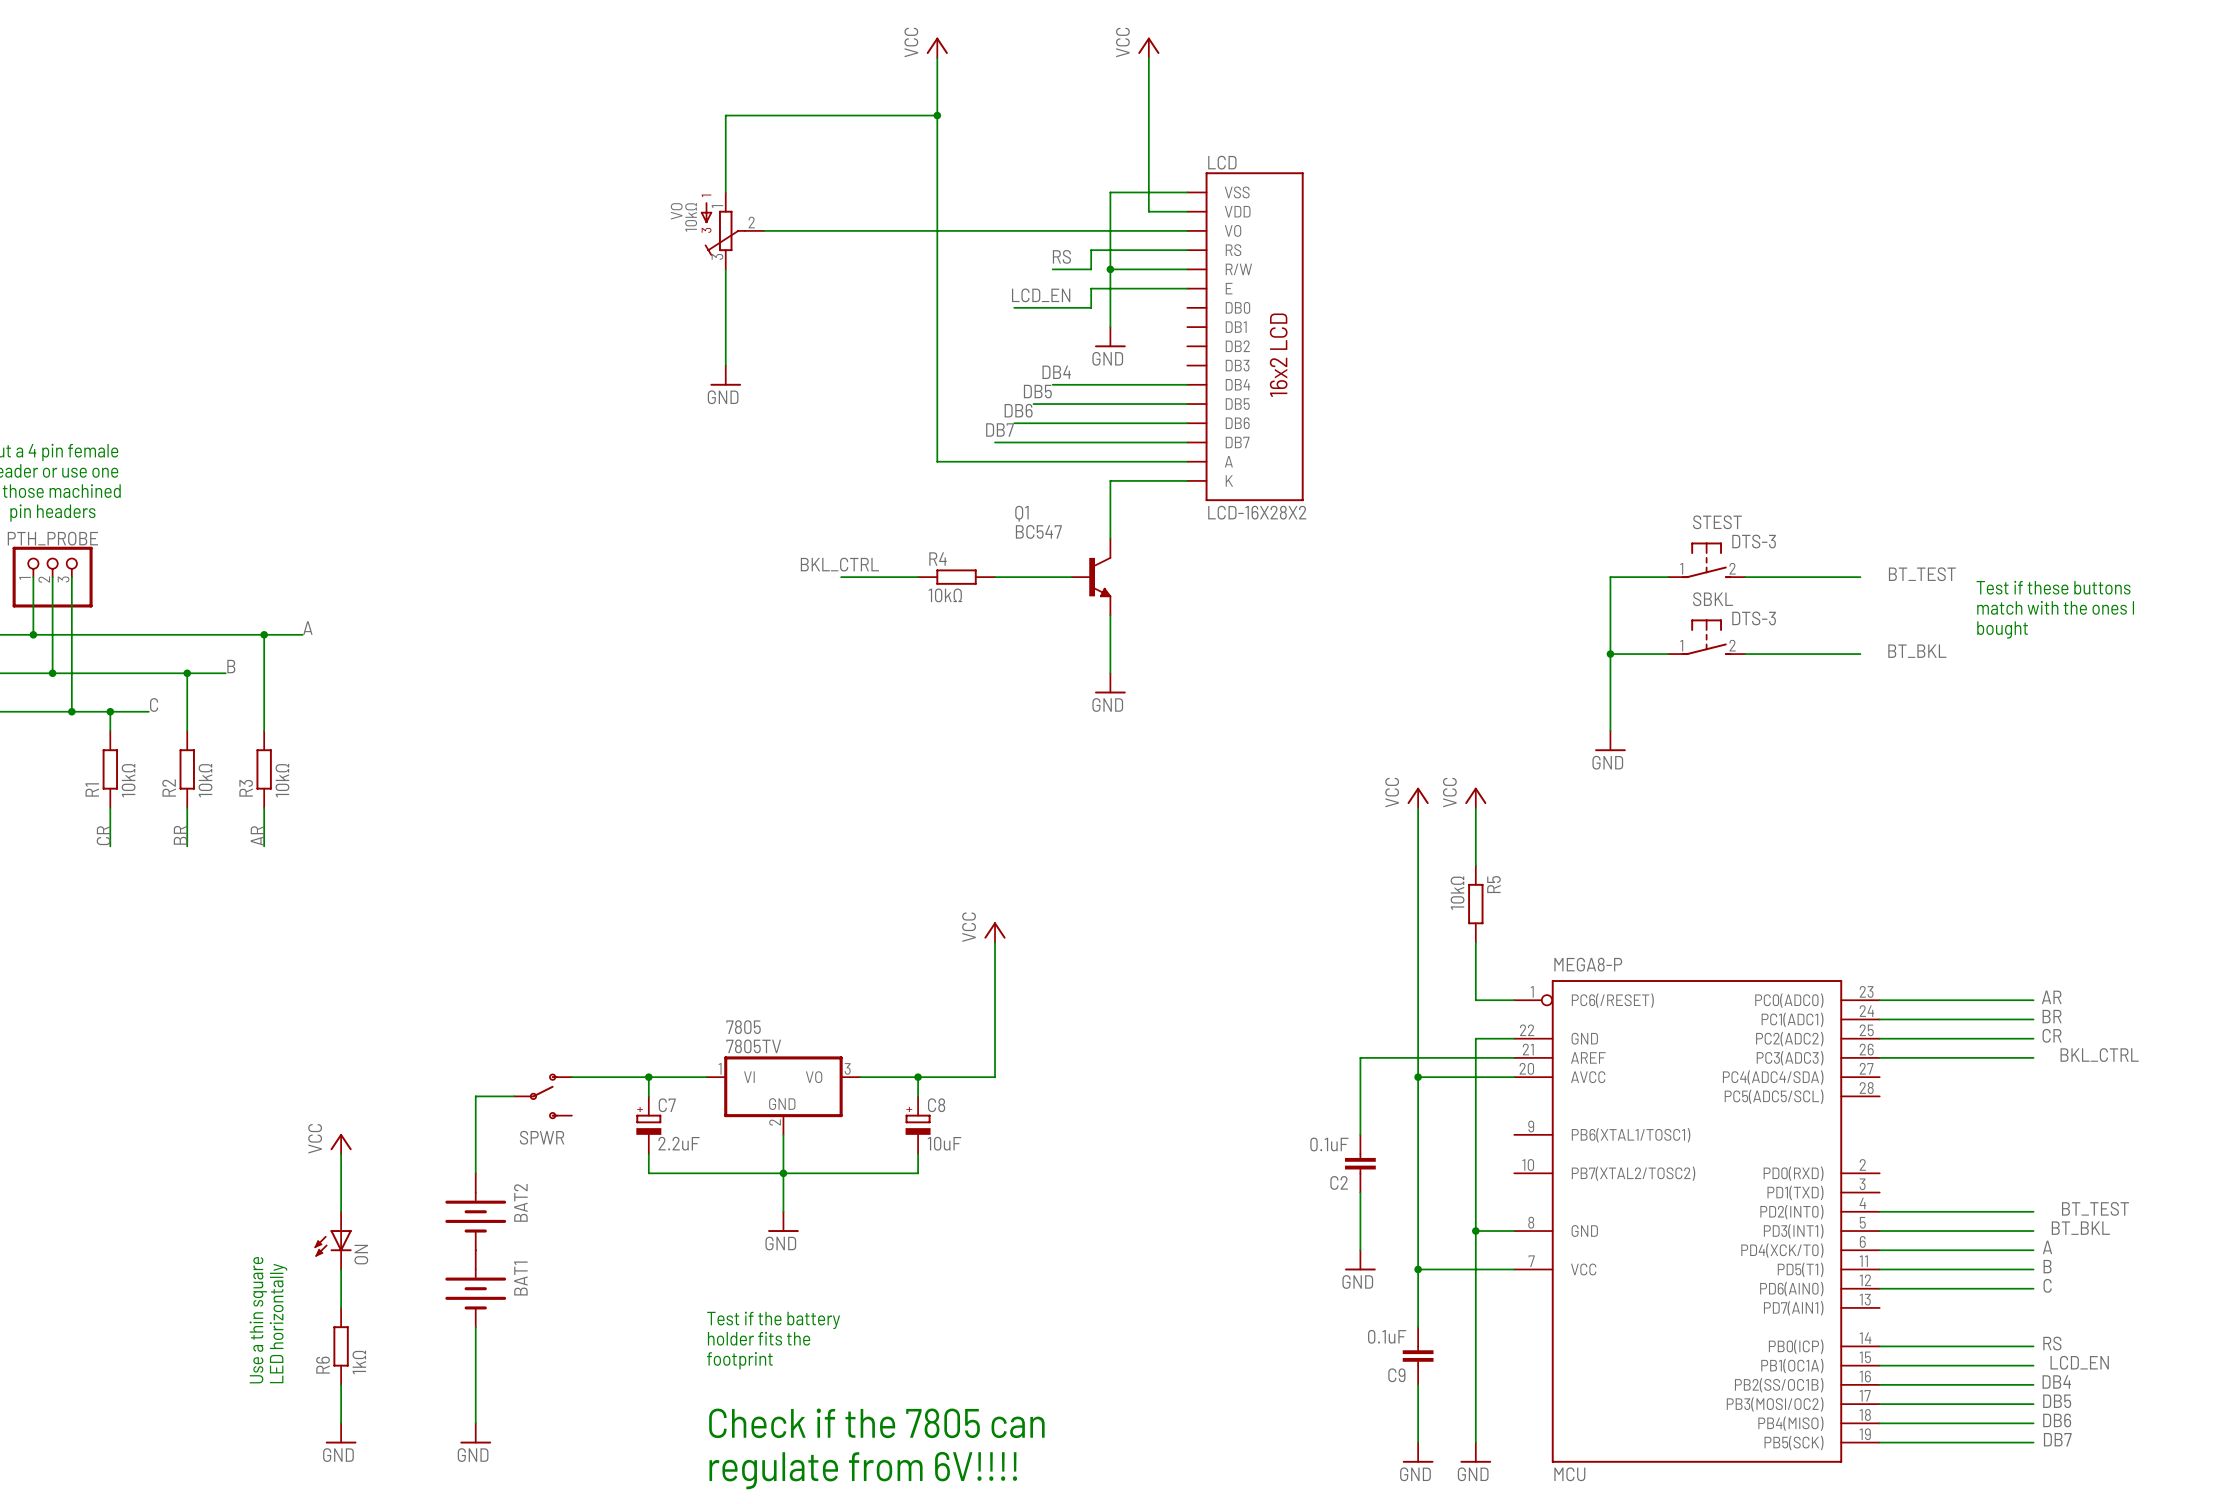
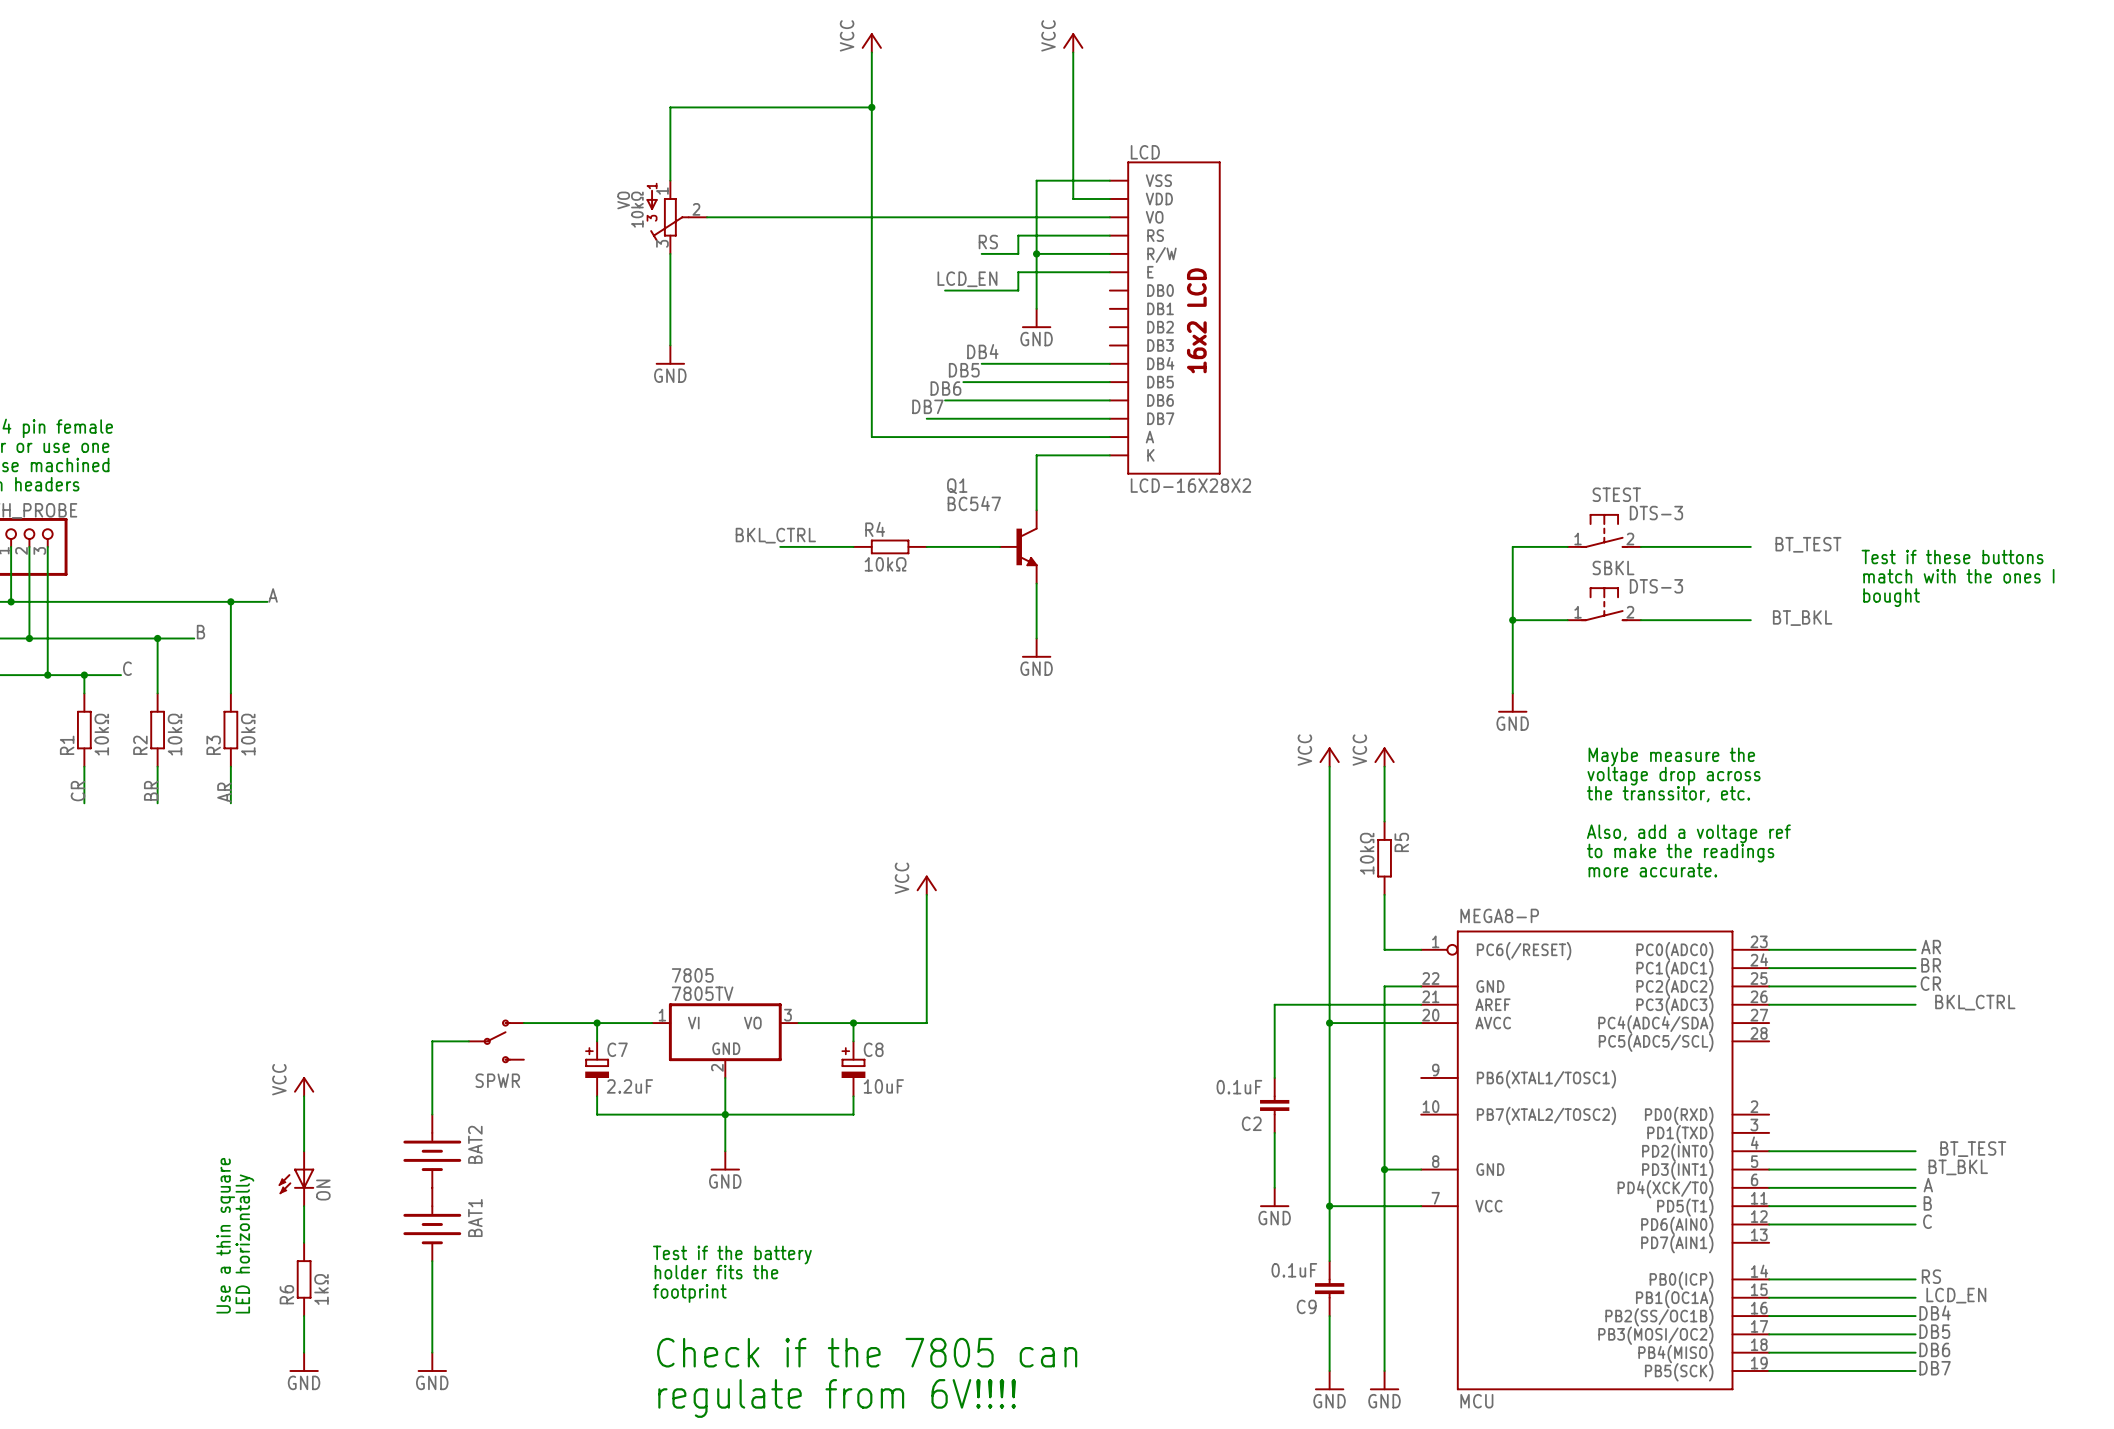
text: none -> Maybe measure the (1671, 756)
text: none -> voltage drop across (1674, 776)
text: none -> the transsitor, etc. (1668, 794)
text: none -> Also, add a voltage ref (1688, 833)
text: none -> to make the readings (1680, 853)
text: none -> more accurate. (1652, 870)

